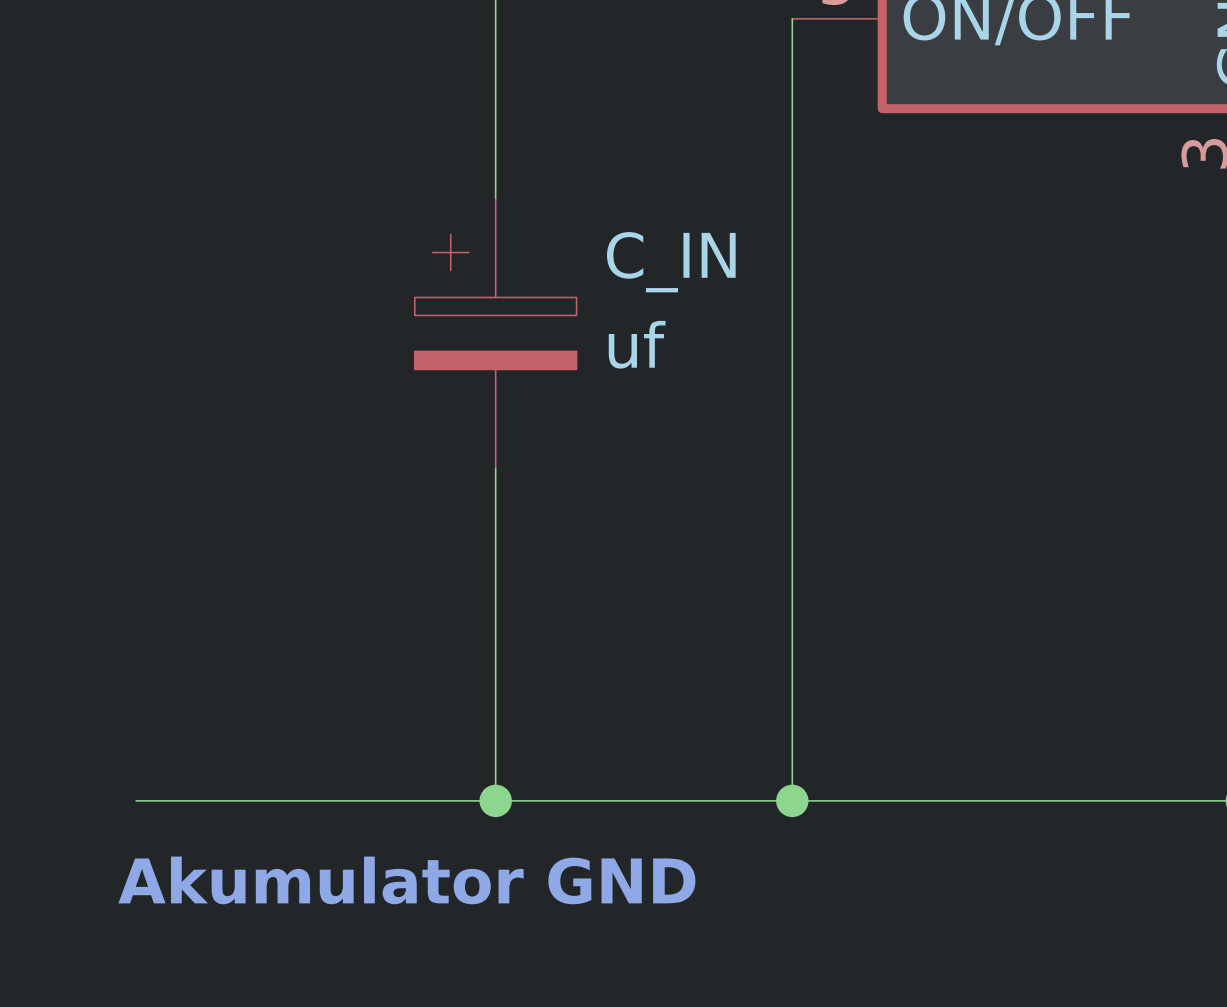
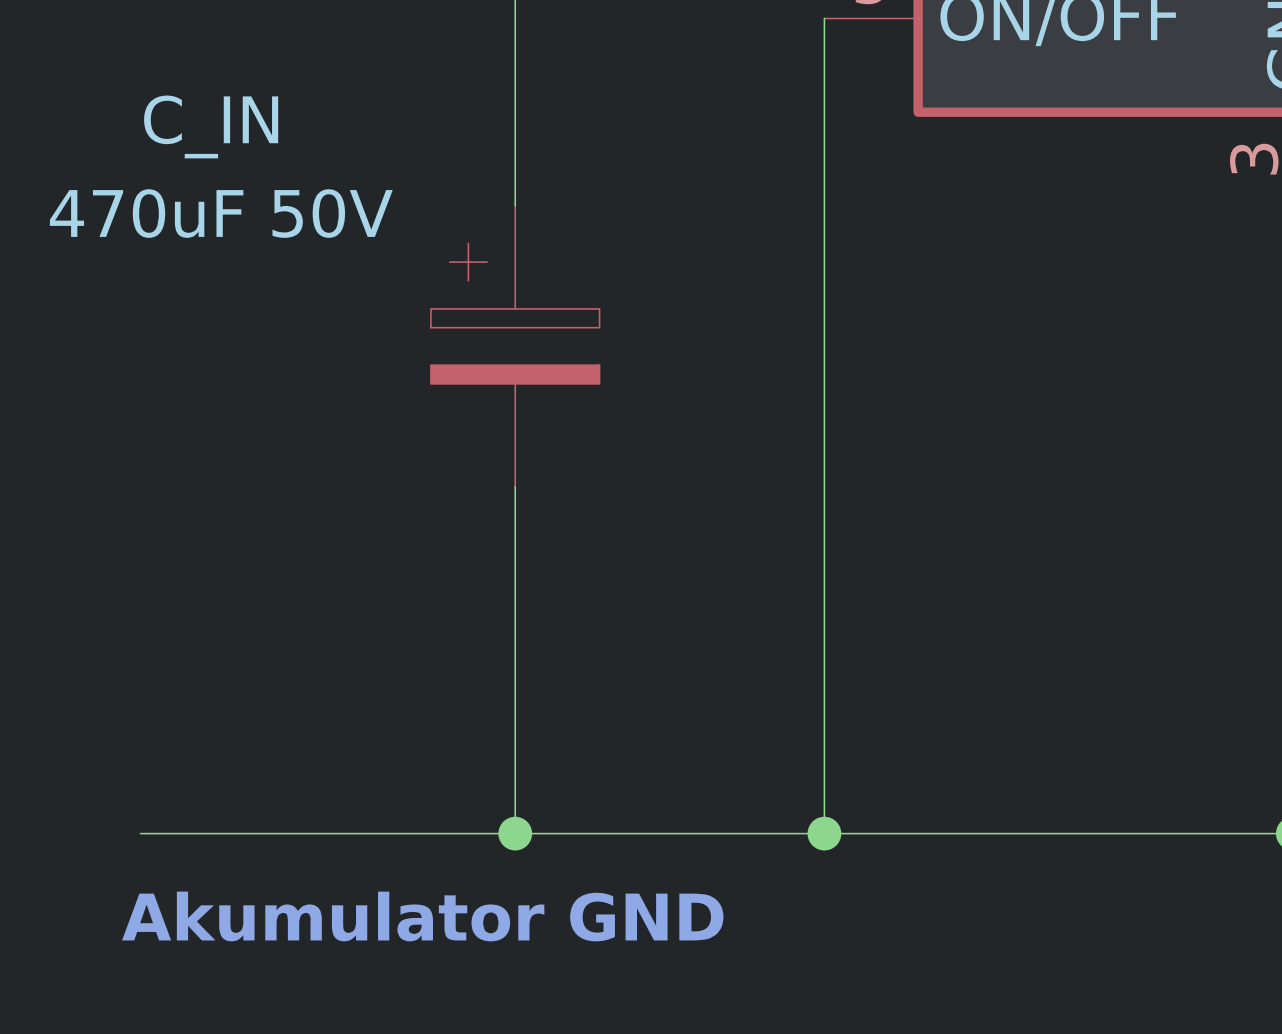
C_IN name position: C_IN (671, 262) -> C_IN (211, 126)
C_IN value: uf (637, 344) -> 470uF 50V (221, 213)

